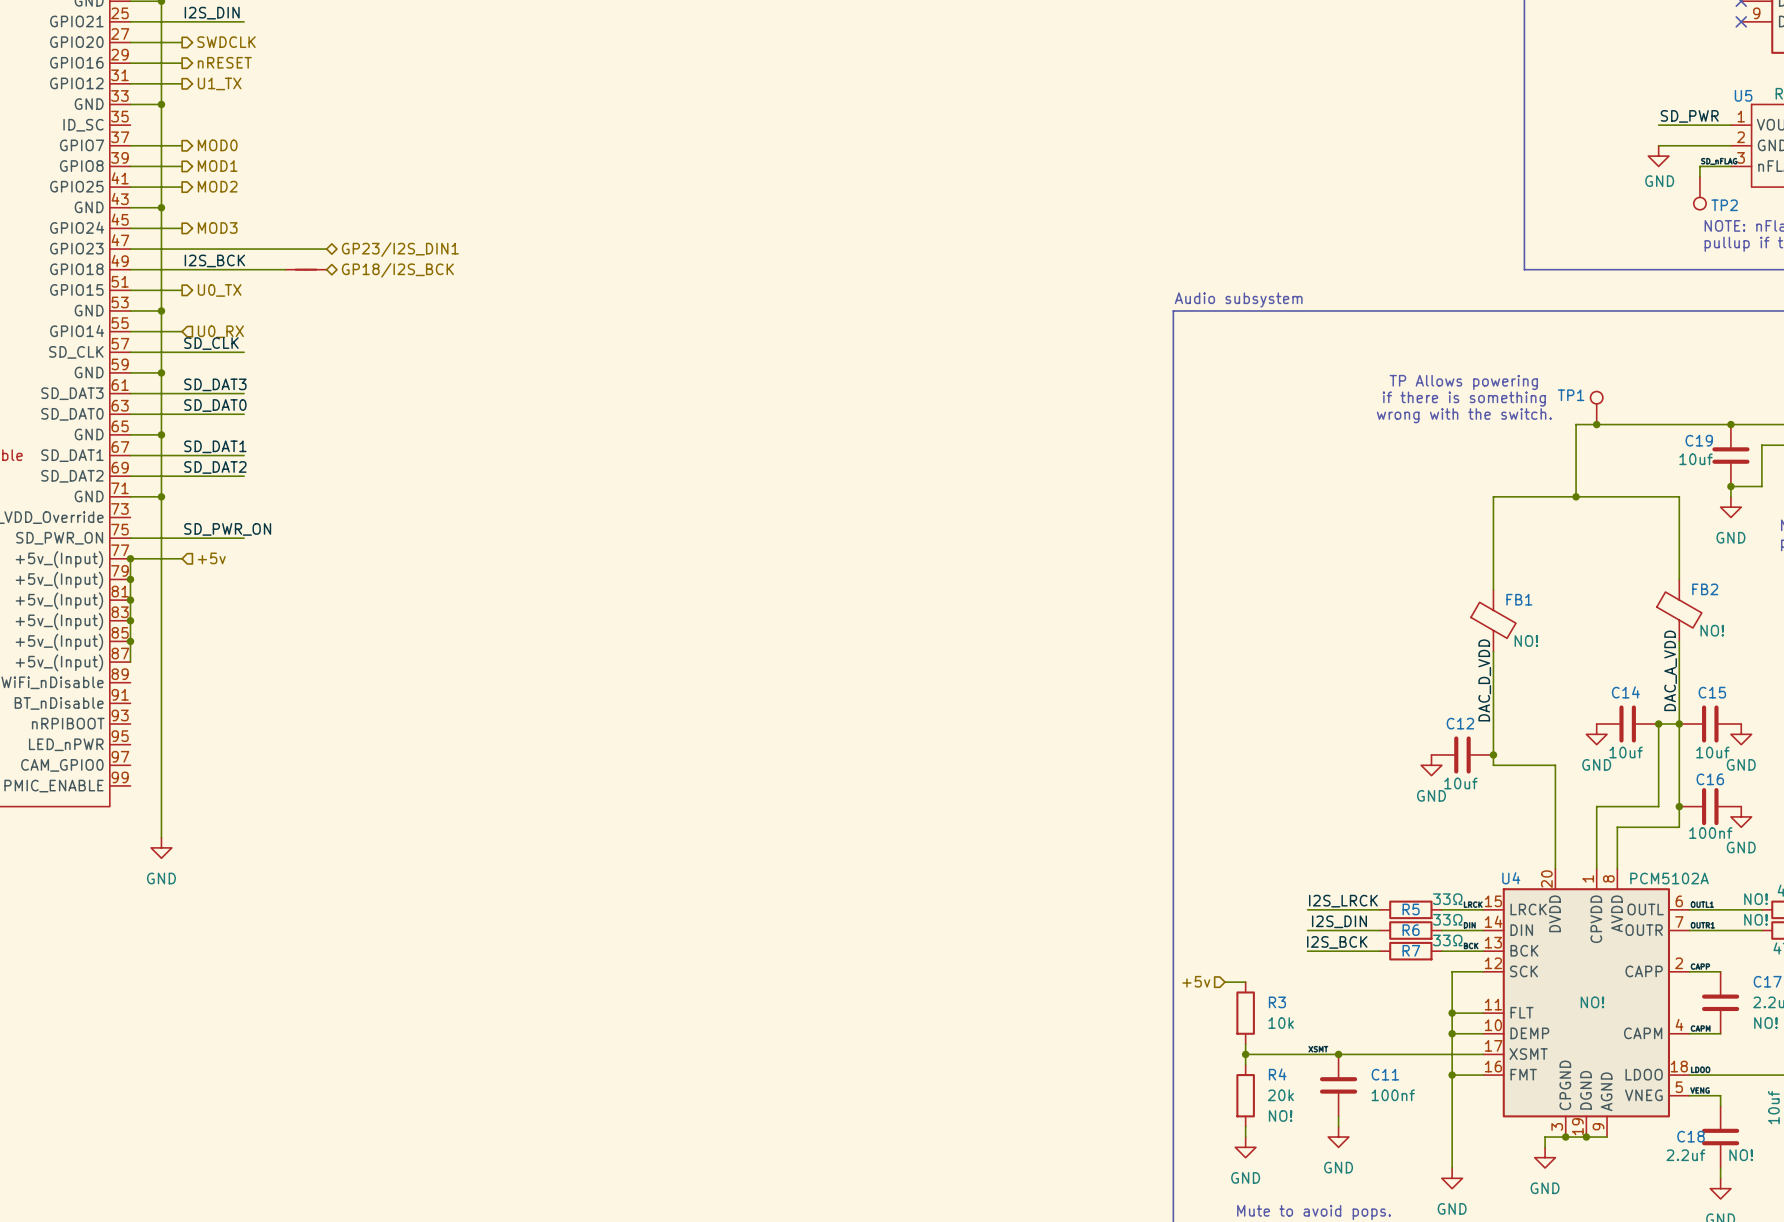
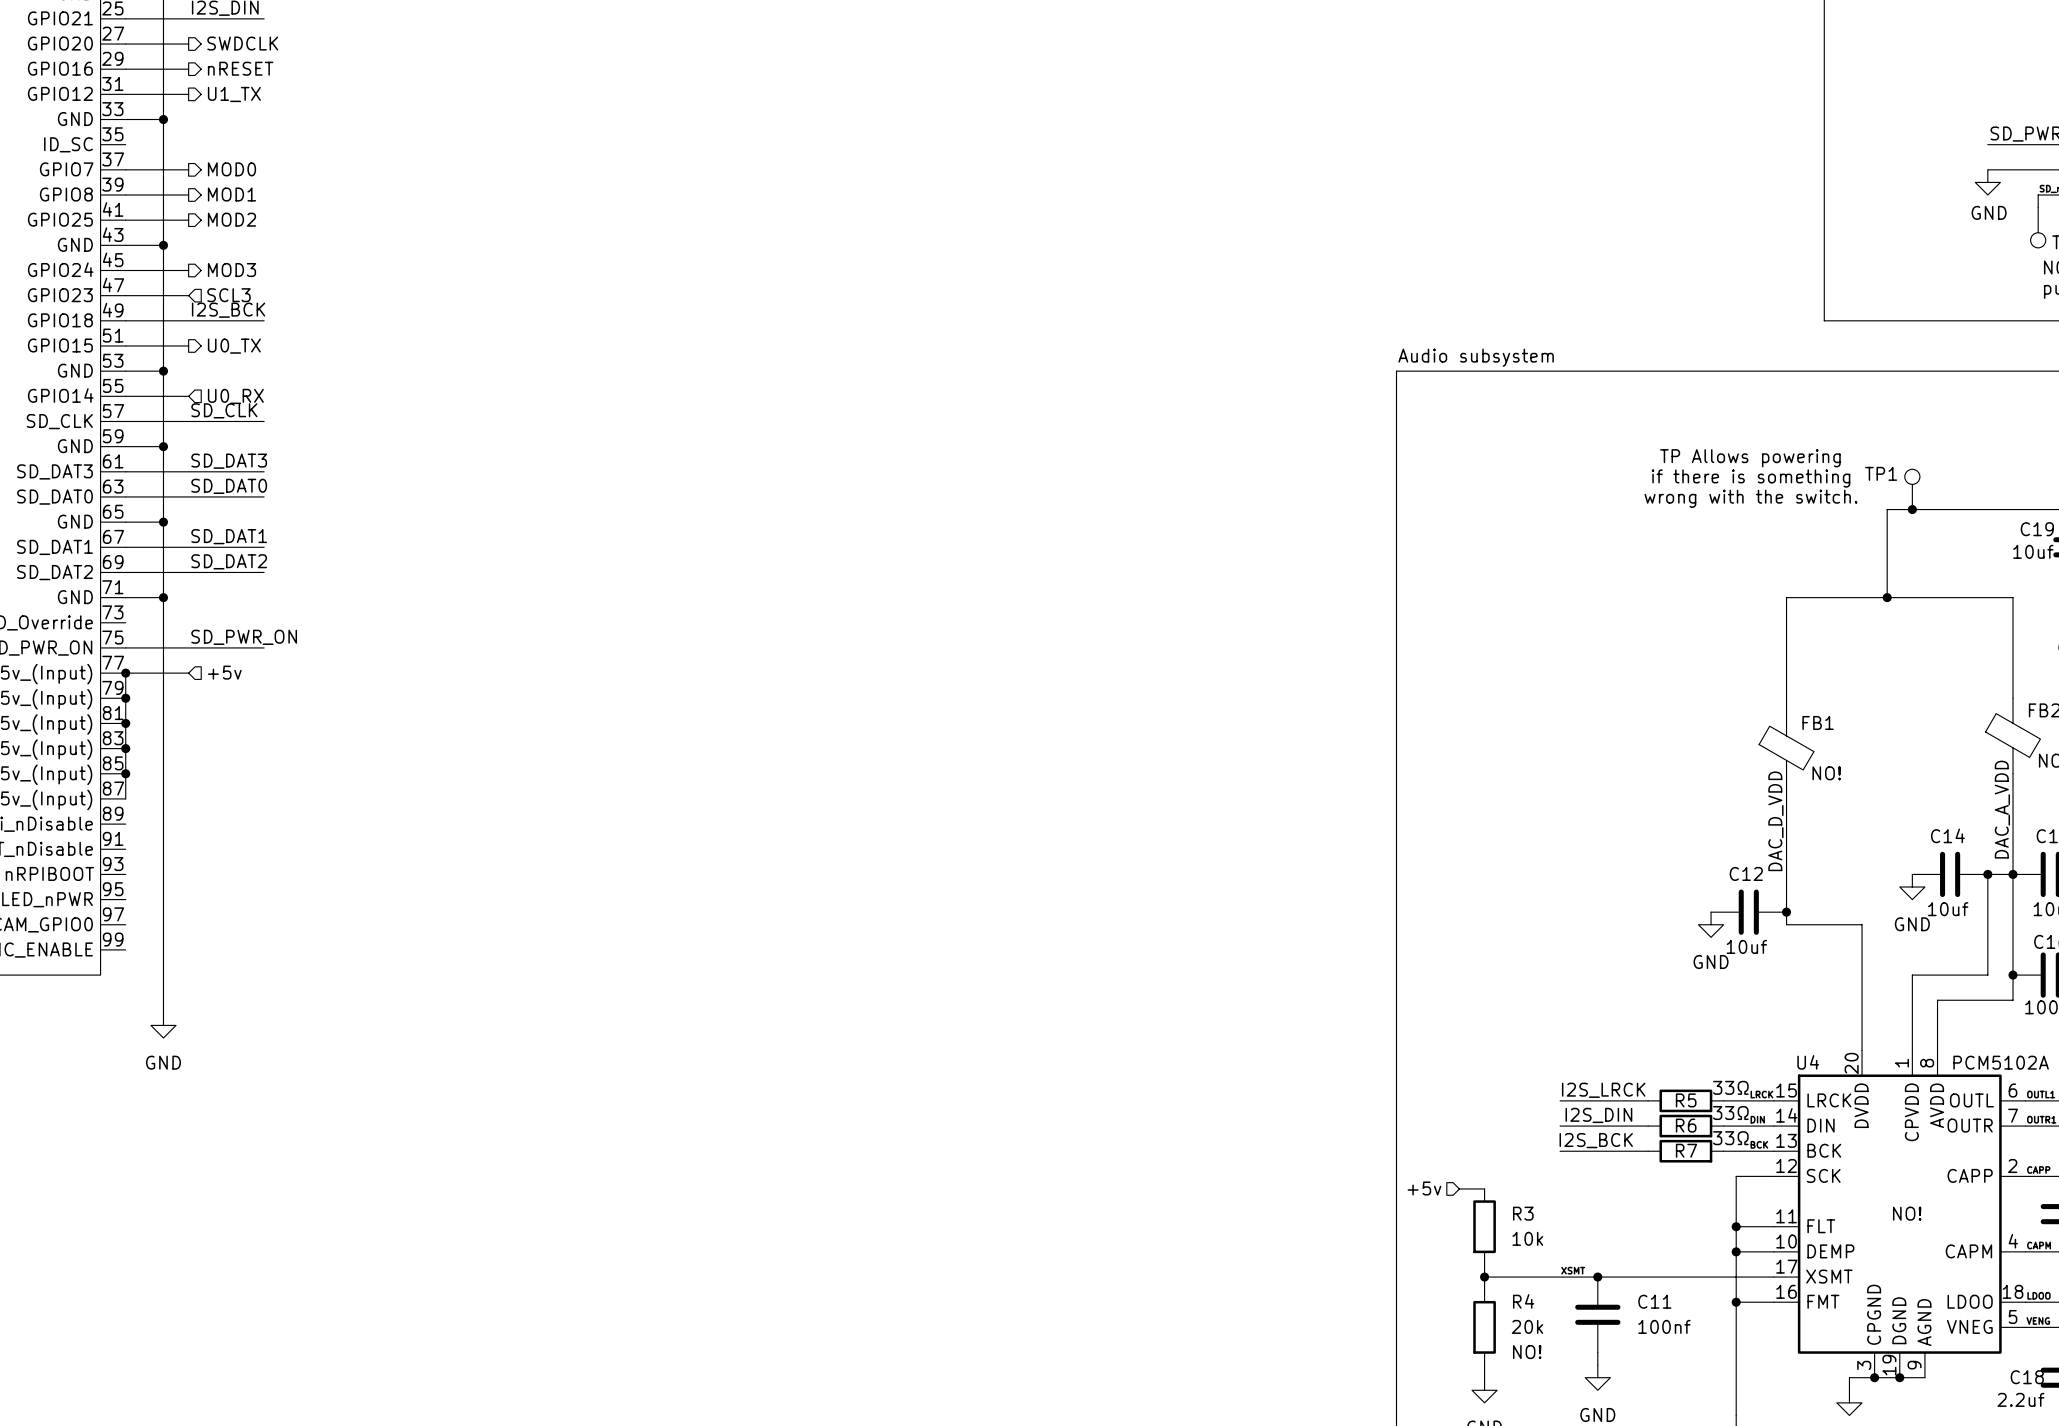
hierarchical label: none -> SCL3 (228, 295)
wire: (182, 249) (326, 249) -> none
hierarchical label: GP23/I2S_DIN1 (400, 249) -> none
wire: (244, 269) (285, 269) -> none
part: (306, 269) -> none
hierarchical label: GP18/I2S_BCK (397, 270) -> none

